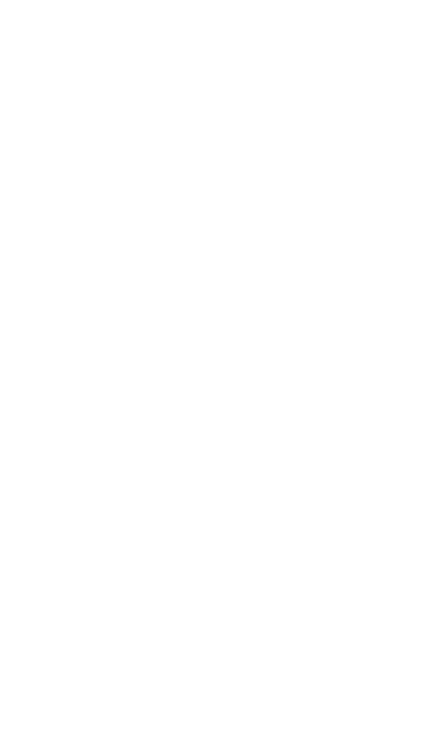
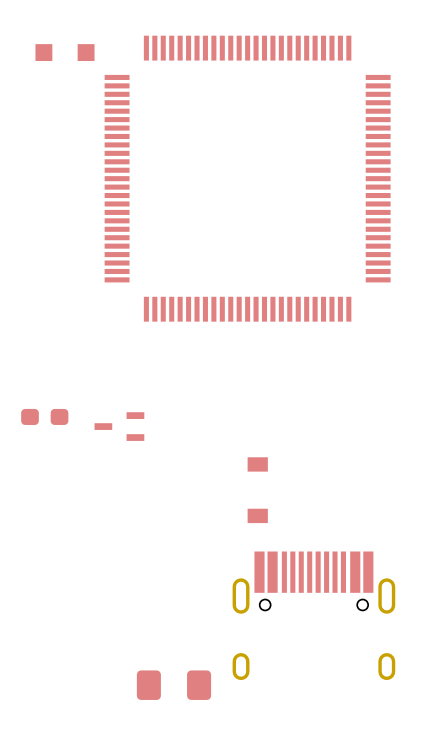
part: none -> (65, 52)
part: none -> (247, 178)
part: none -> (44, 416)
part: none -> (119, 426)
part: none -> (257, 490)
part: none -> (313, 615)
part: none -> (173, 685)

